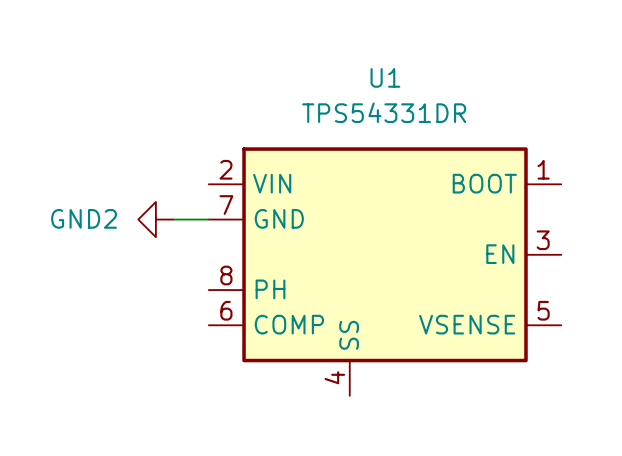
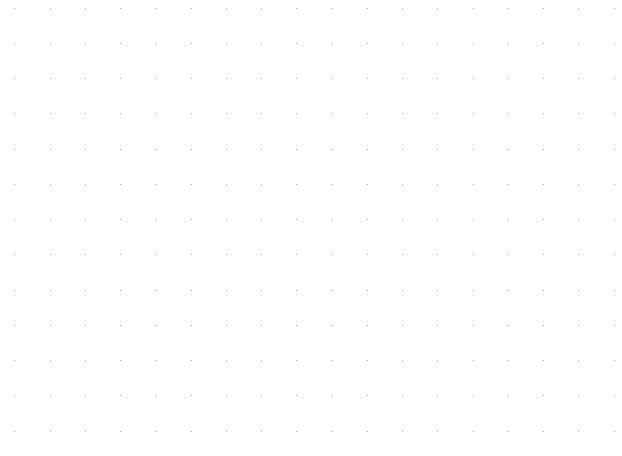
power symbol: GND2 (155, 219) -> none
wire: (173, 219) (208, 219) -> none
U1: TPS54331DR (385, 271) -> none

